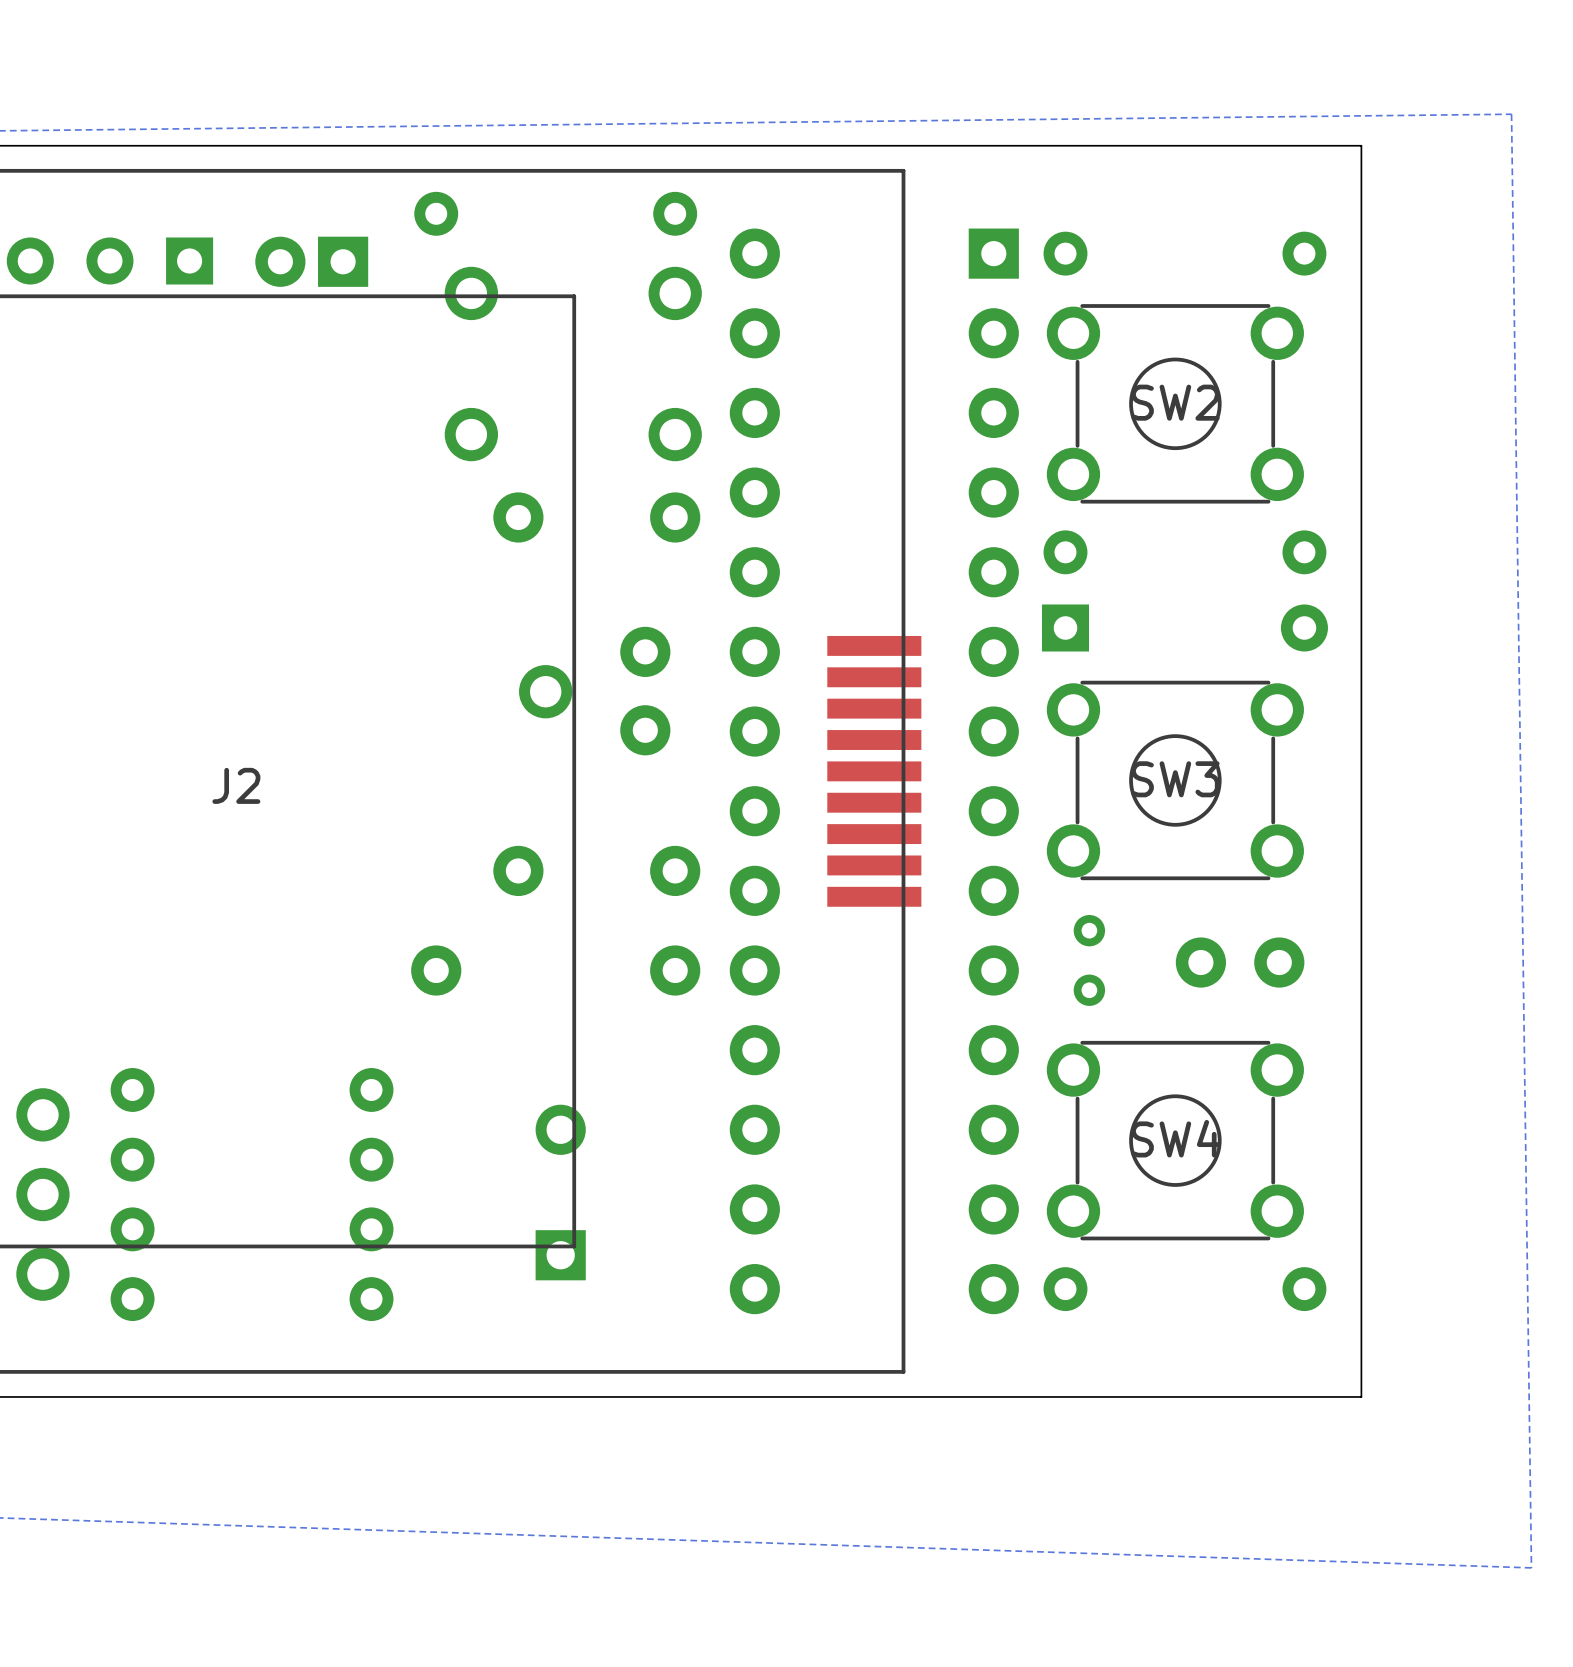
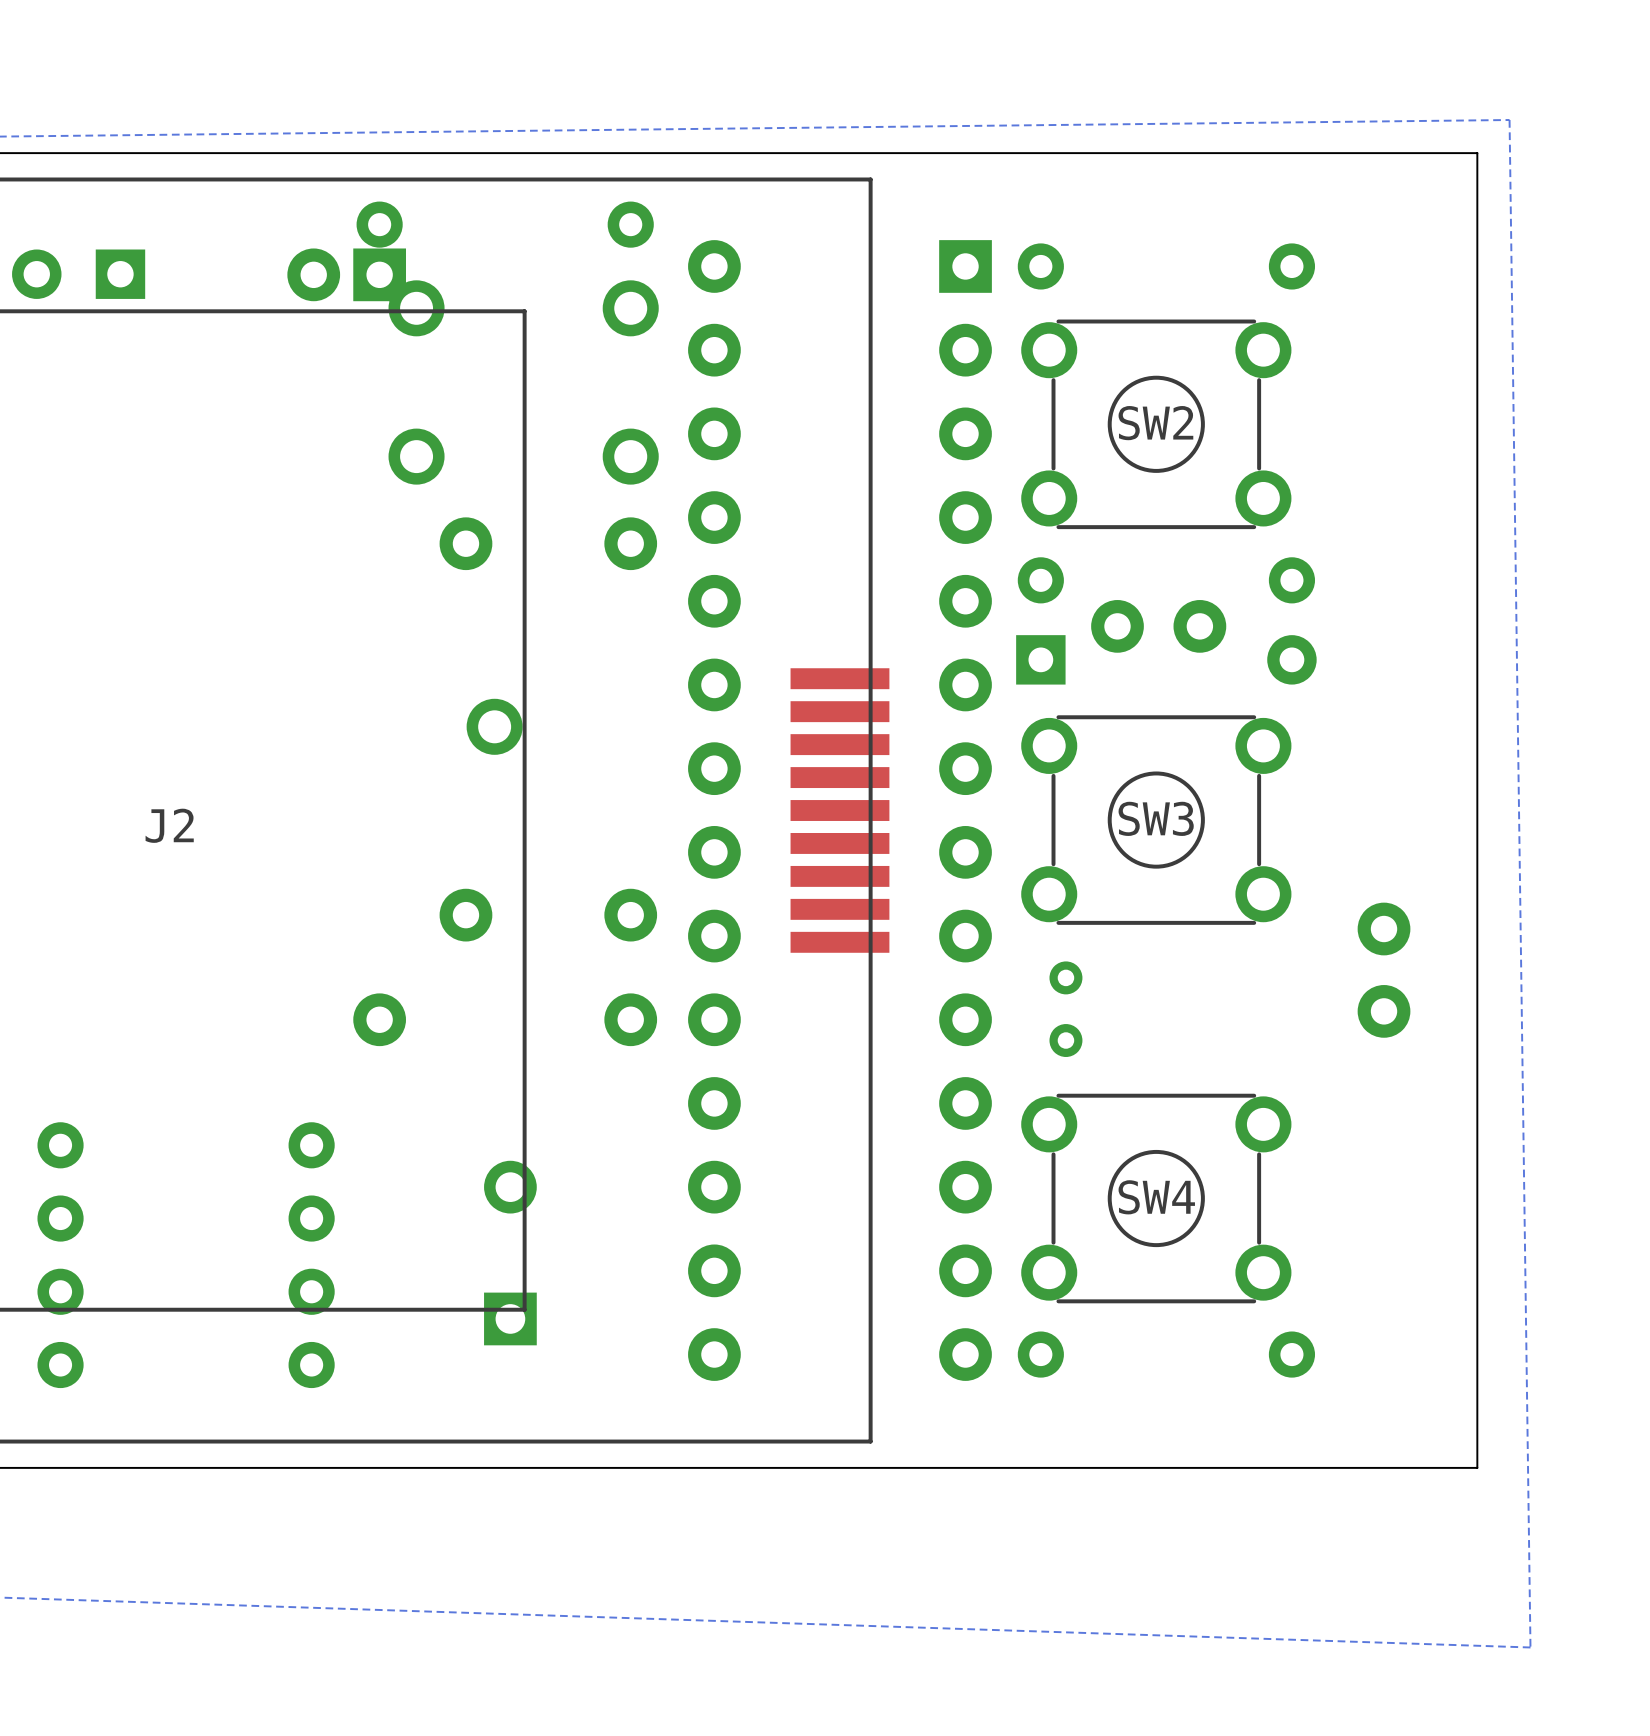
board edge: (1361, 145) (1361, 1396) -> (1351, 153) (1477, 153) (1477, 1467) (1351, 1467)
part position: (311, 261) -> (346, 274)
part: none -> (1158, 626)
part: (645, 691) -> none
part rotation: 0° (1240, 962) -> 90° clockwise (1384, 970)
part position: (1240, 962) -> (1384, 970)

